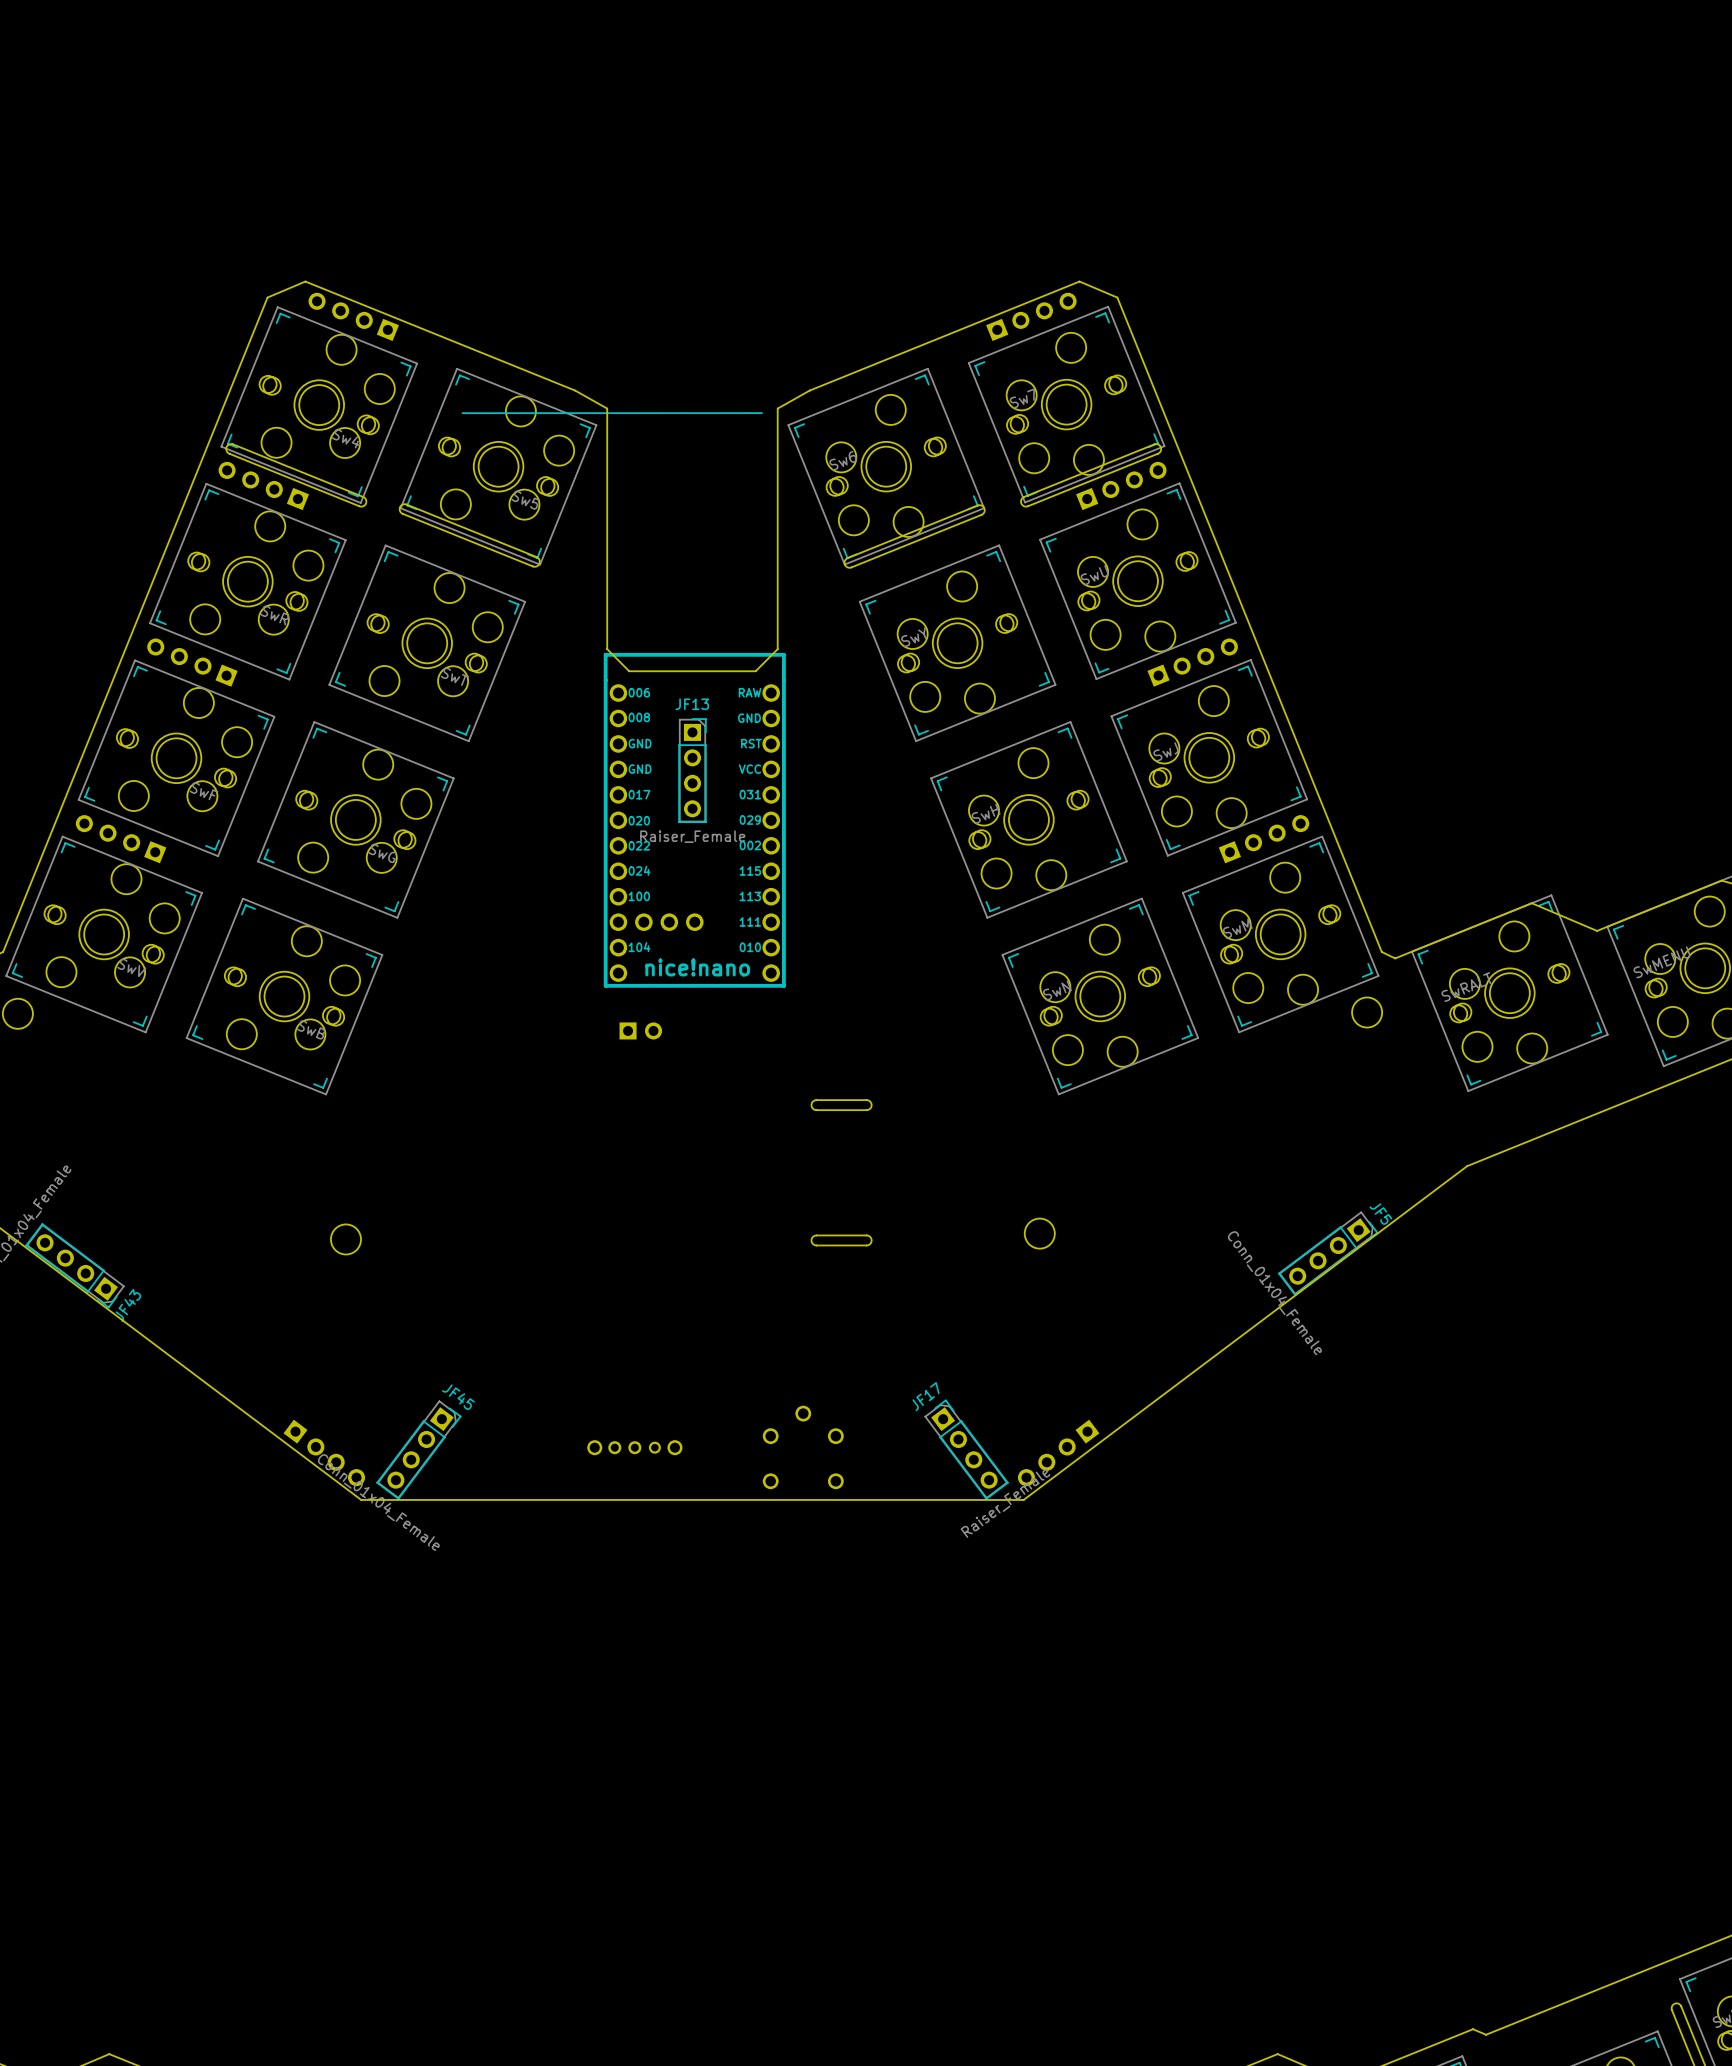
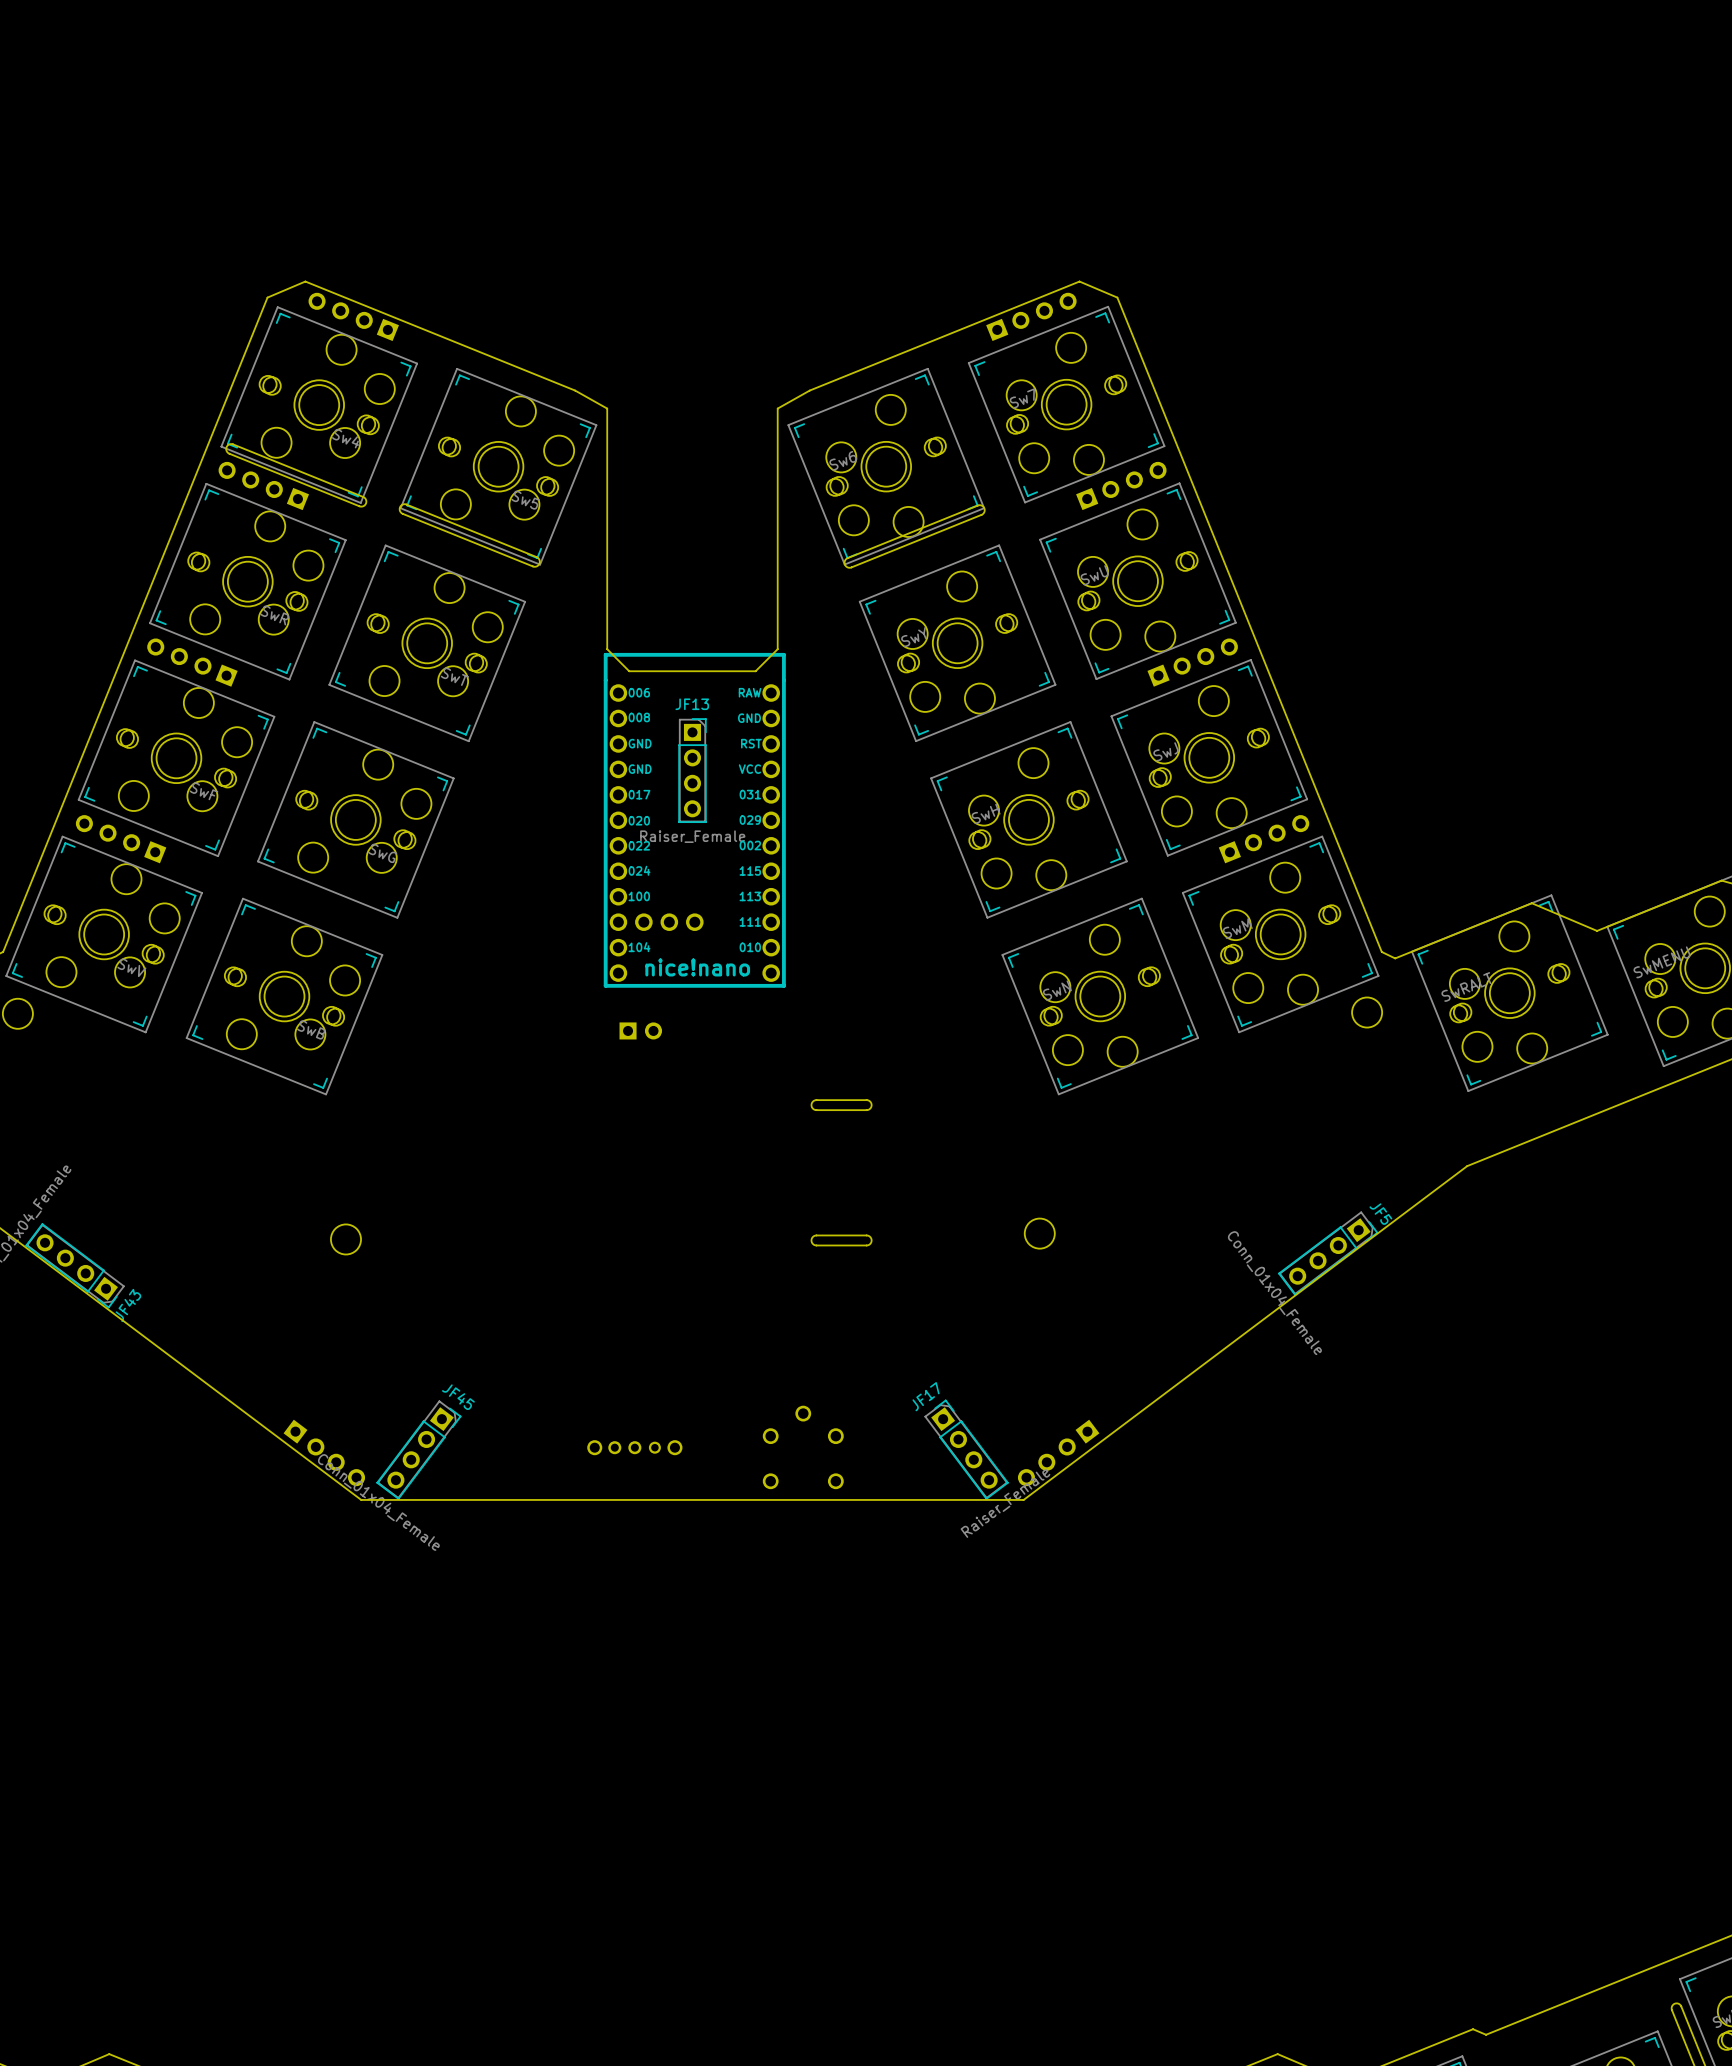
line: (761, 413) (462, 413) -> none
board edge: (1154, 444) (1024, 496) (1021, 503) (1027, 506) (1158, 453) (1160, 447) (1158, 444) (1156, 444) (1154, 444) -> none

